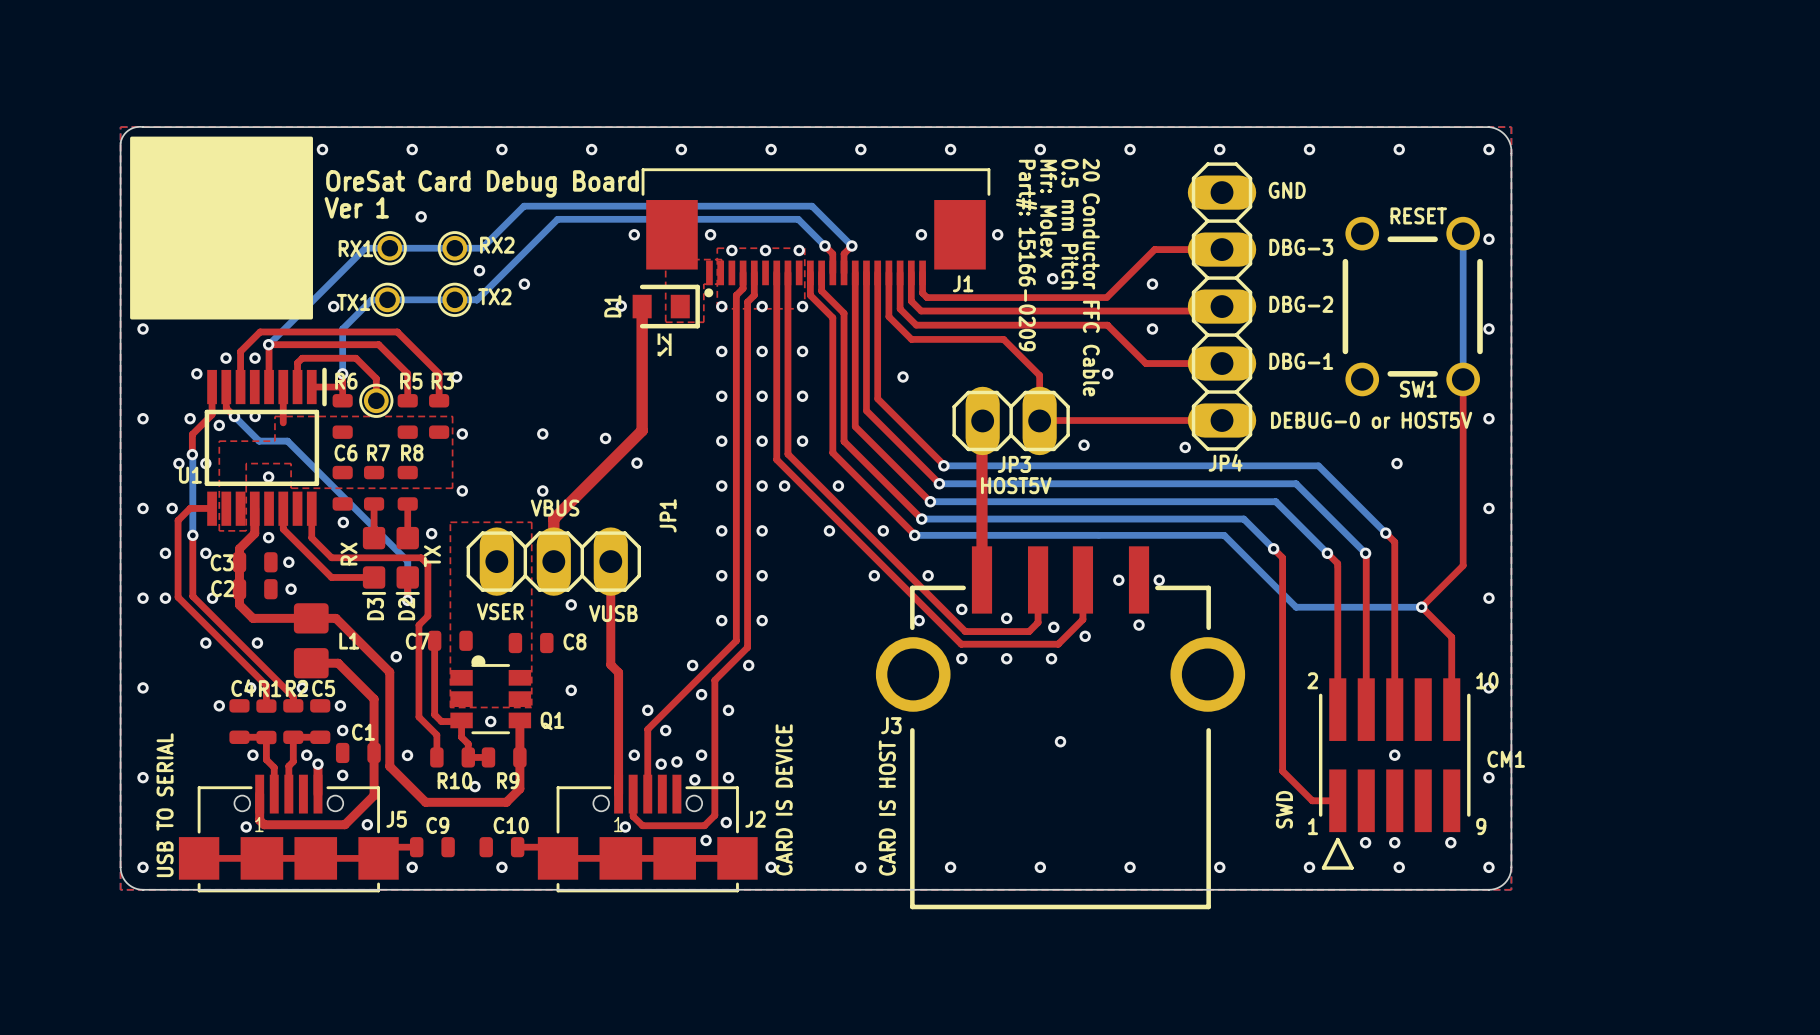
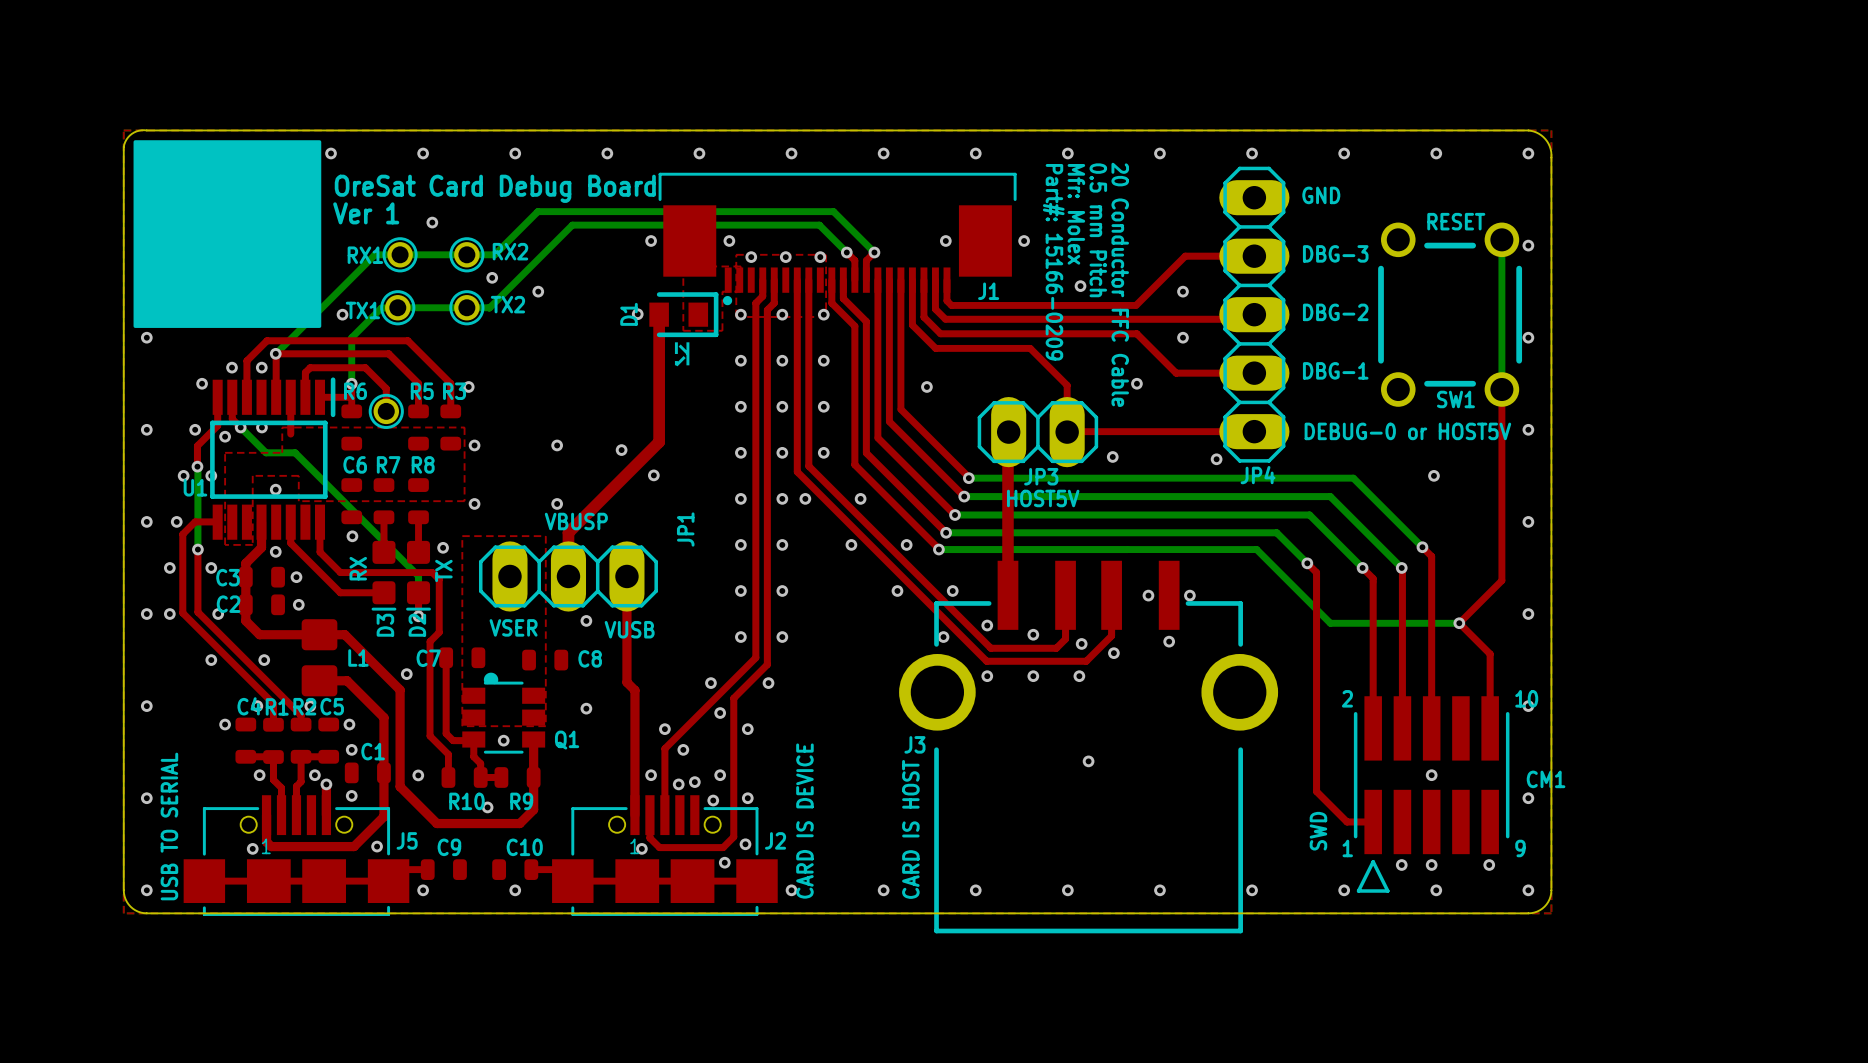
text: VBUS (555, 508) -> VBUSP (576, 521)

